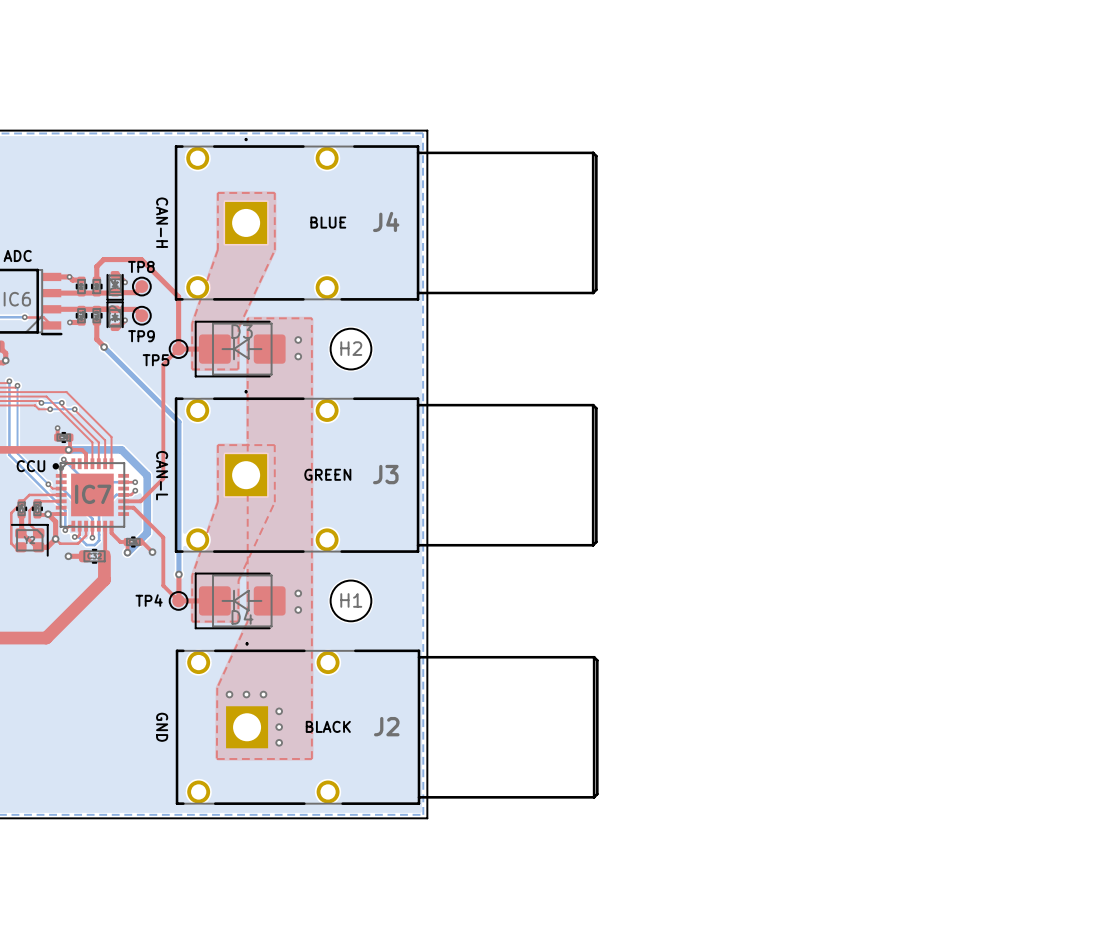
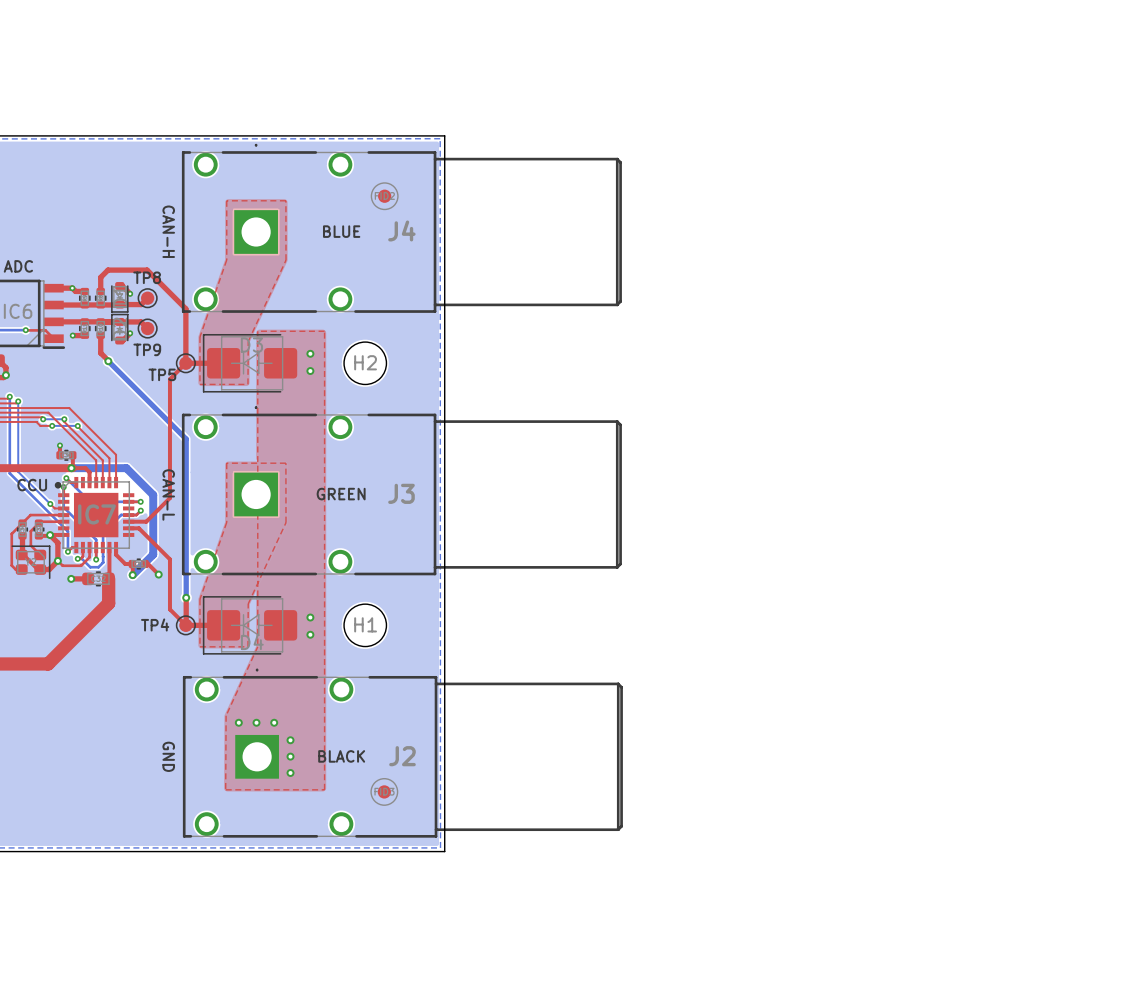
part: none -> (384, 196)
part: none -> (384, 791)

